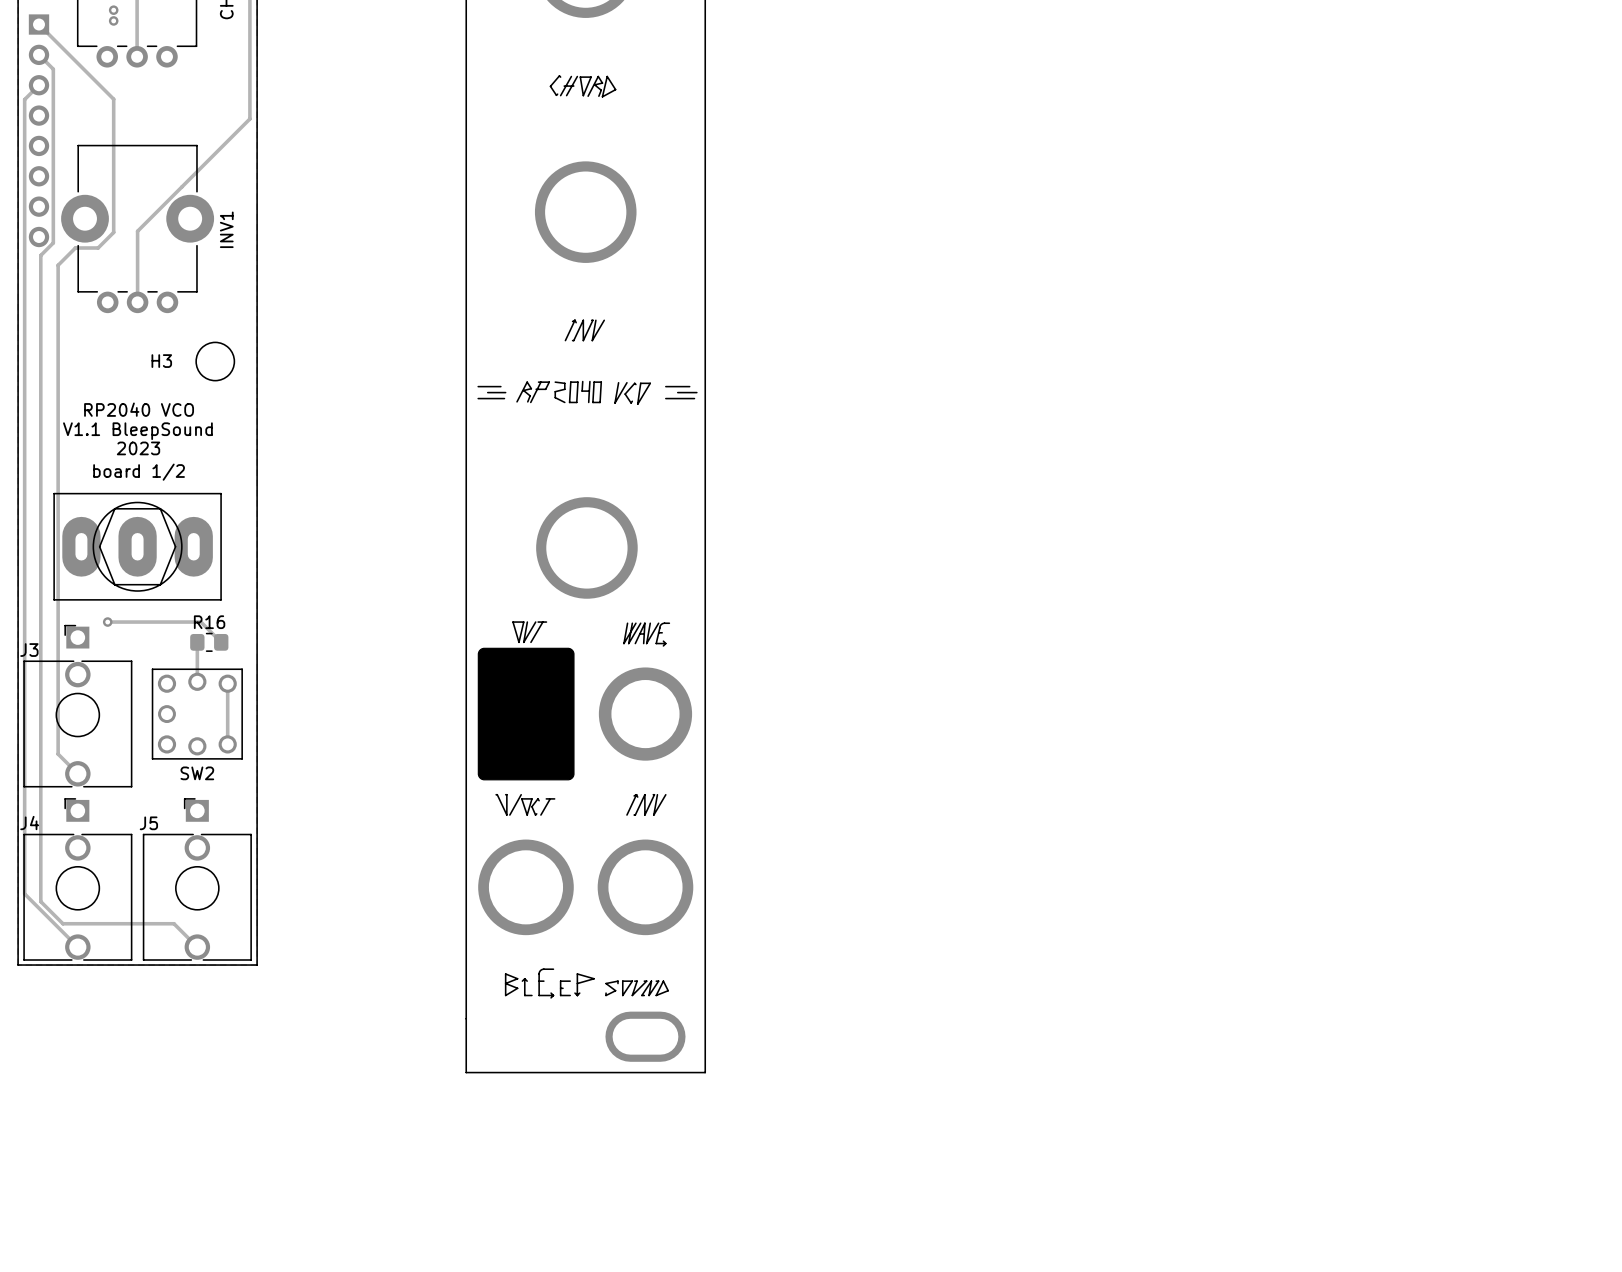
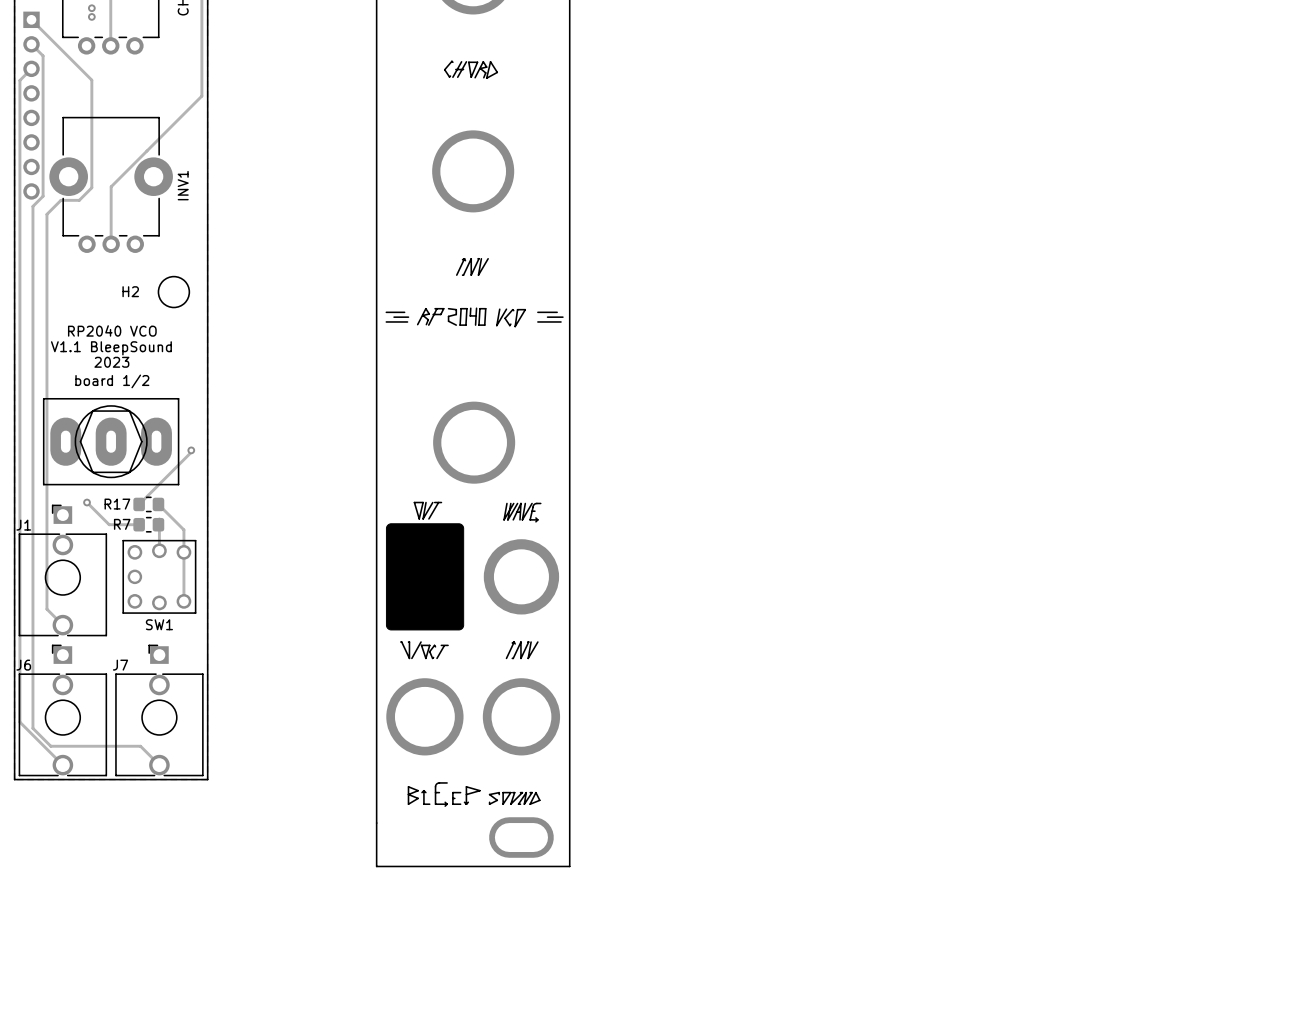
H3 name: H3 (161, 361) -> H2 (130, 291)
track: none -> (191, 450) (139, 504)
via: none -> (191, 450)
track: (107, 622) (200, 622) (221, 642) -> (87, 502) (109, 524) (139, 524)
R17: none -> (148, 504)
track: none -> (158, 504) (183, 529) (183, 552)
R16: (209, 642) -> none
R7: none -> (148, 524)
J3 name: J3 (29, 650) -> J1 (23, 525)
SW2 name: SW2 (197, 773) -> SW1 (159, 624)
J4 name: J4 (29, 823) -> J6 (23, 665)
J5 name: J5 (148, 823) -> J7 (120, 665)

